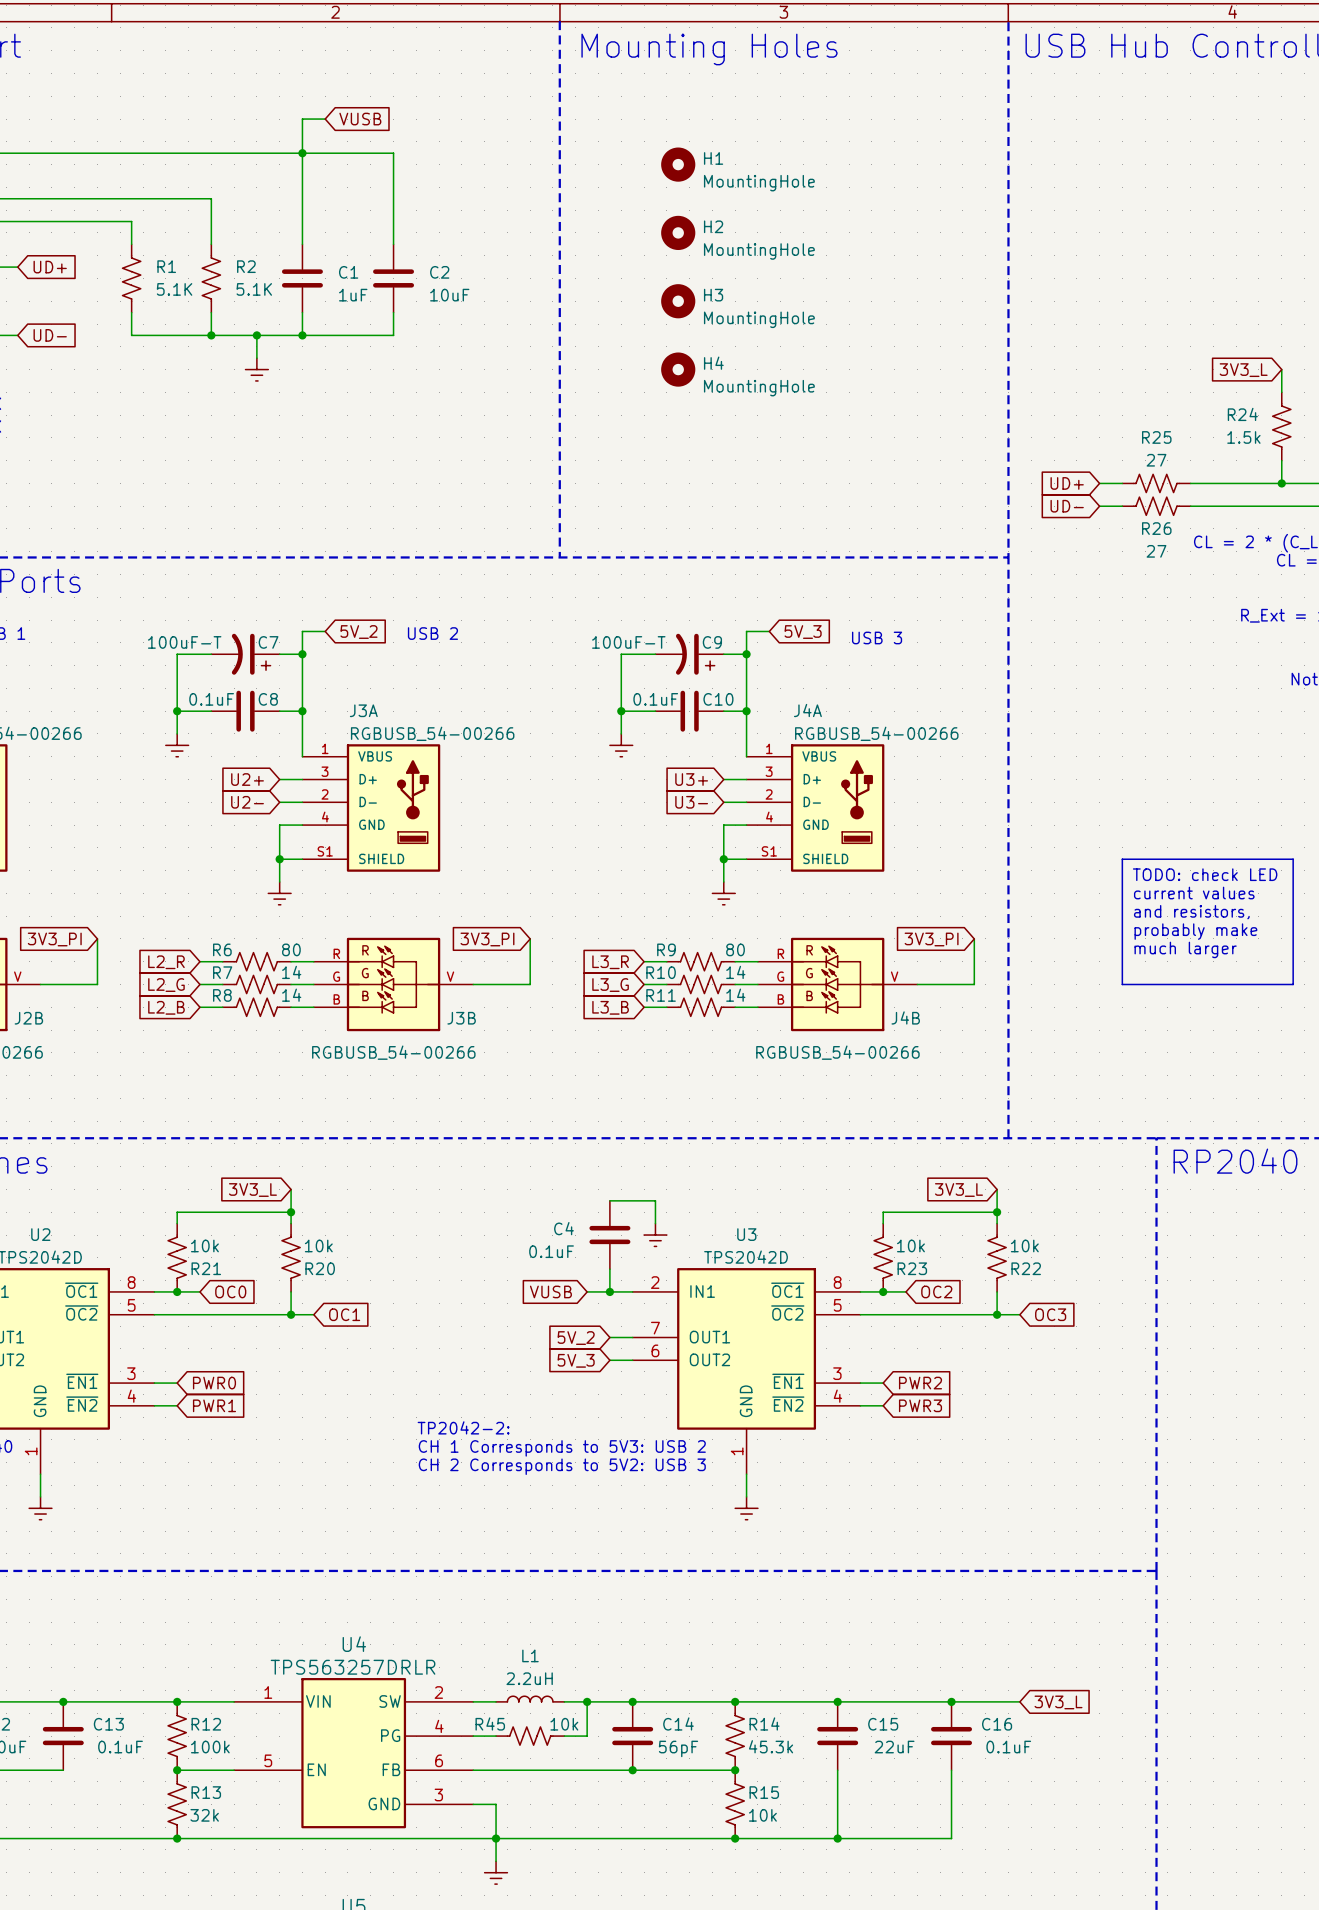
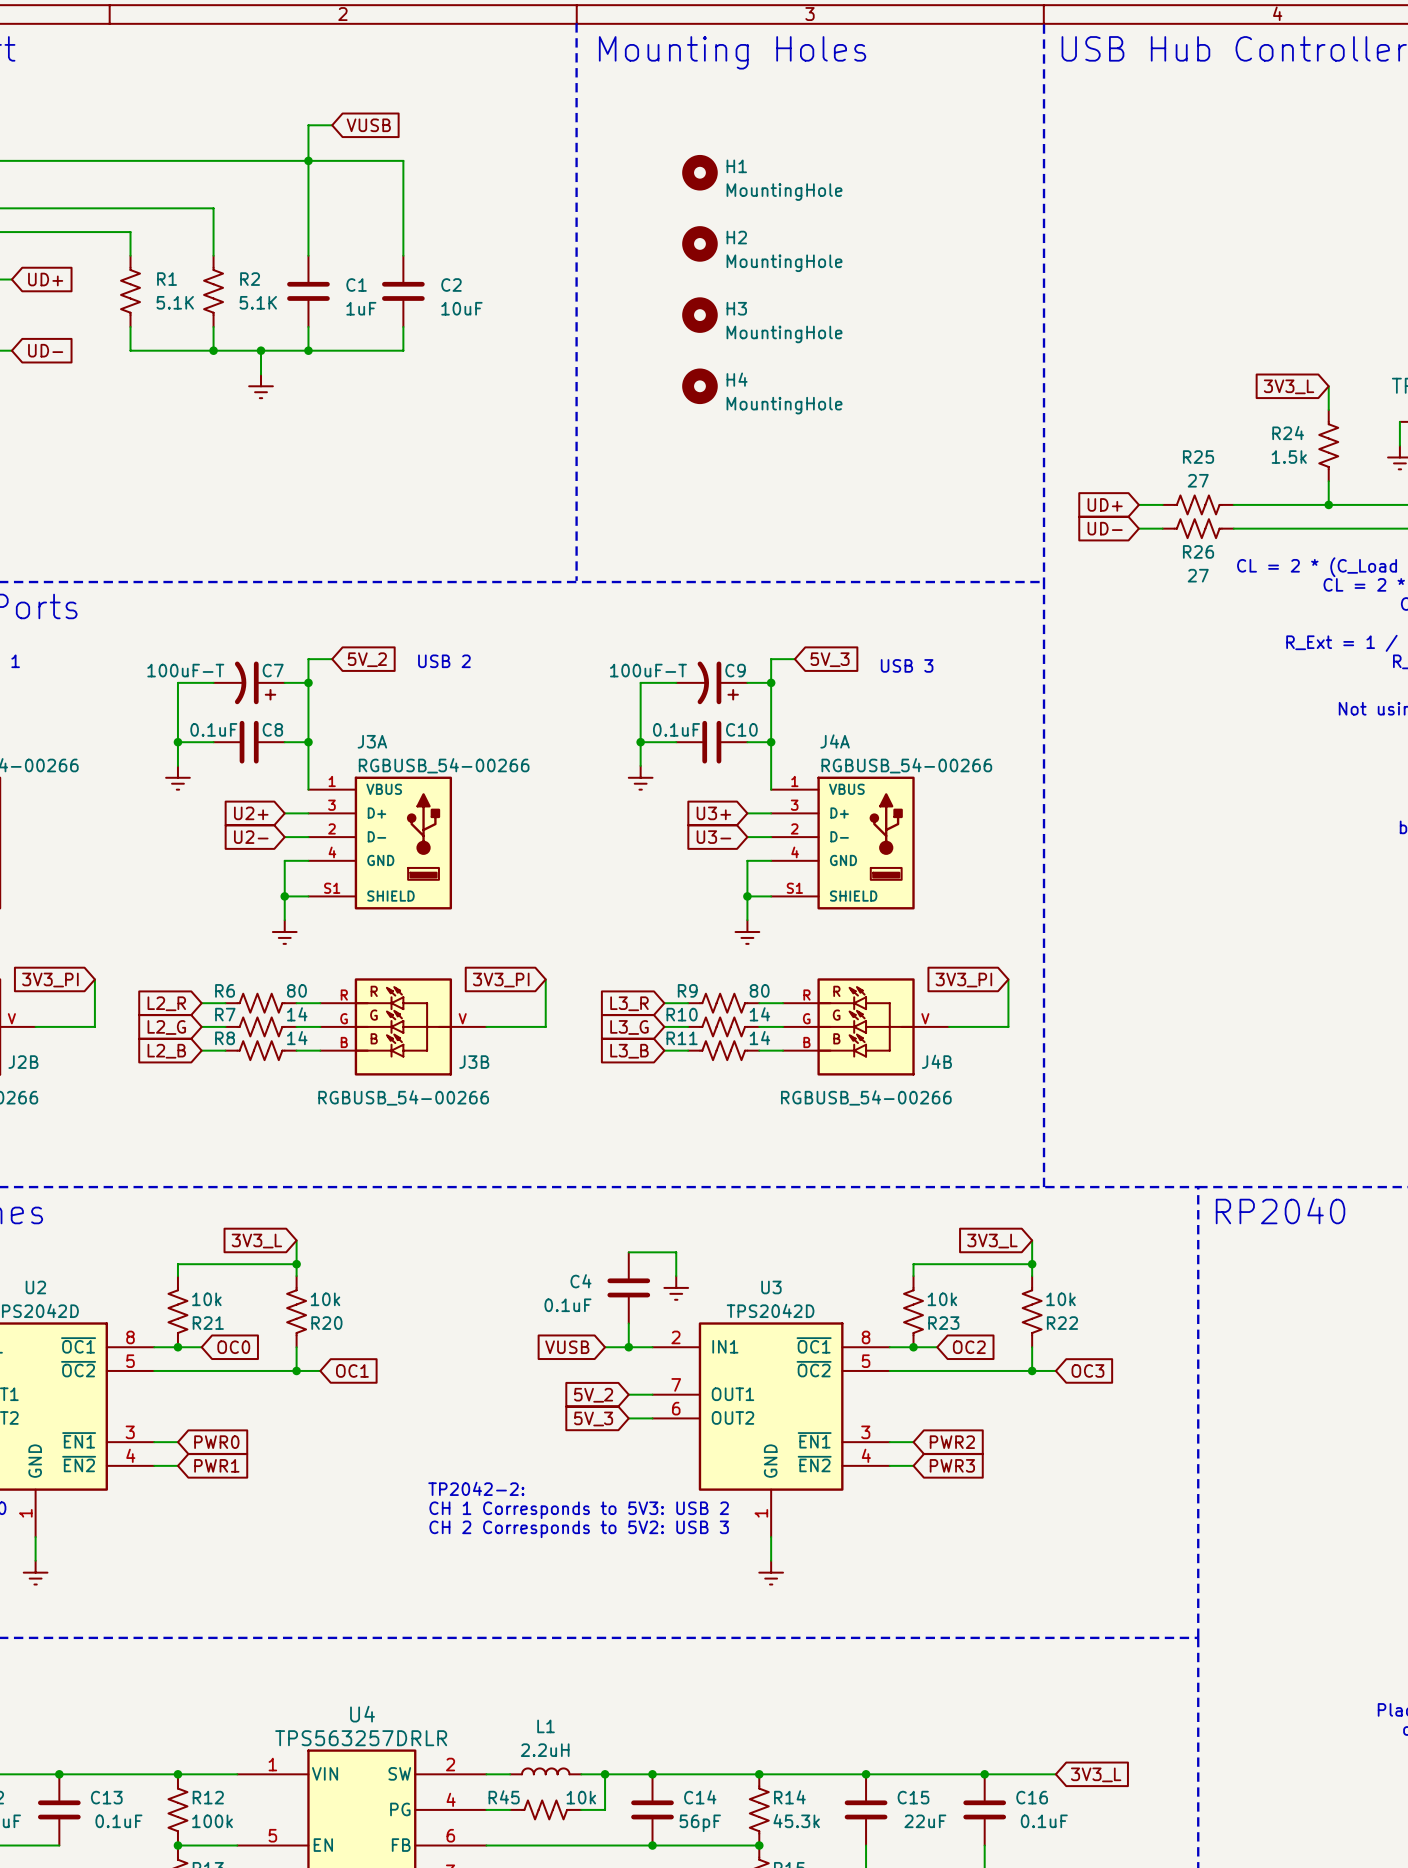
line: (1122, 859) (1293, 859) (1293, 984) (1122, 984) (1122, 859) -> none
text: TODO: check LED (1205, 874) -> none
text: current values (1194, 893) -> none
text: and resistors, (1191, 912) -> none
text: probably make (1195, 931) -> none
text: much larger (1185, 949) -> none

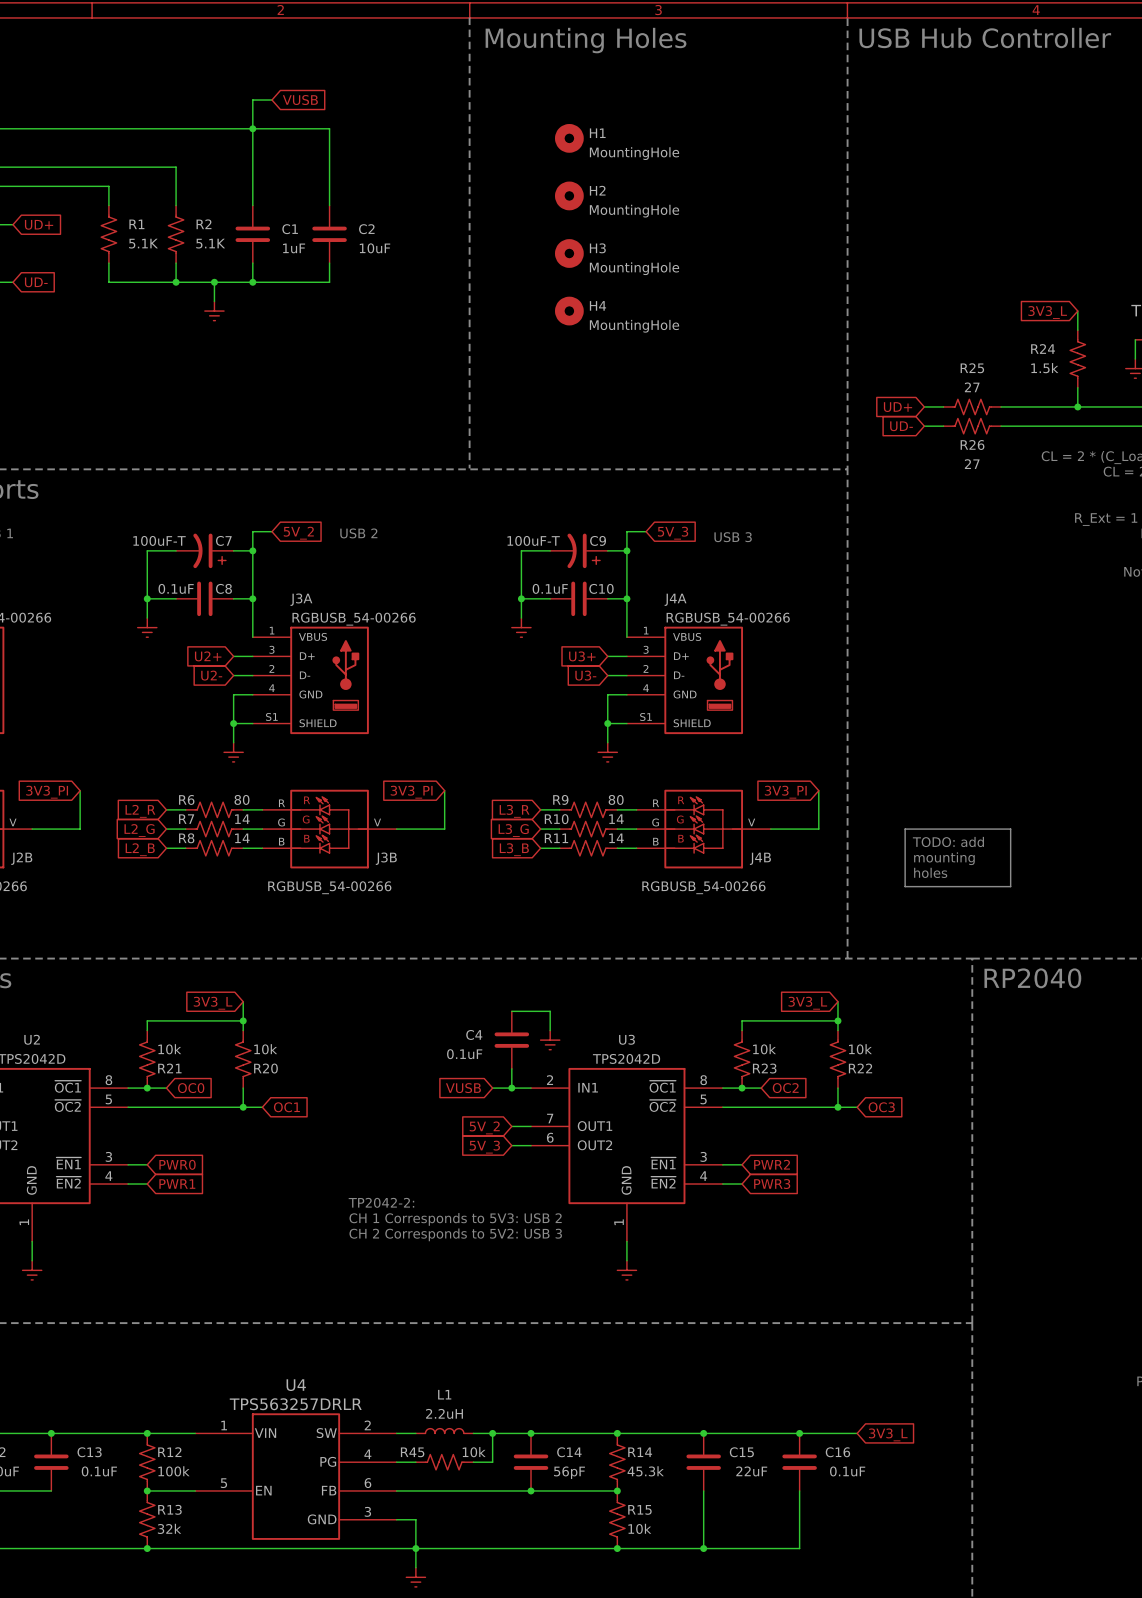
line: none -> (905, 829) (1010, 829) (1010, 886) (905, 886) (905, 829)
text: none -> TODO: add (948, 841)
text: none -> mounting (944, 858)
text: none -> holes (930, 872)

